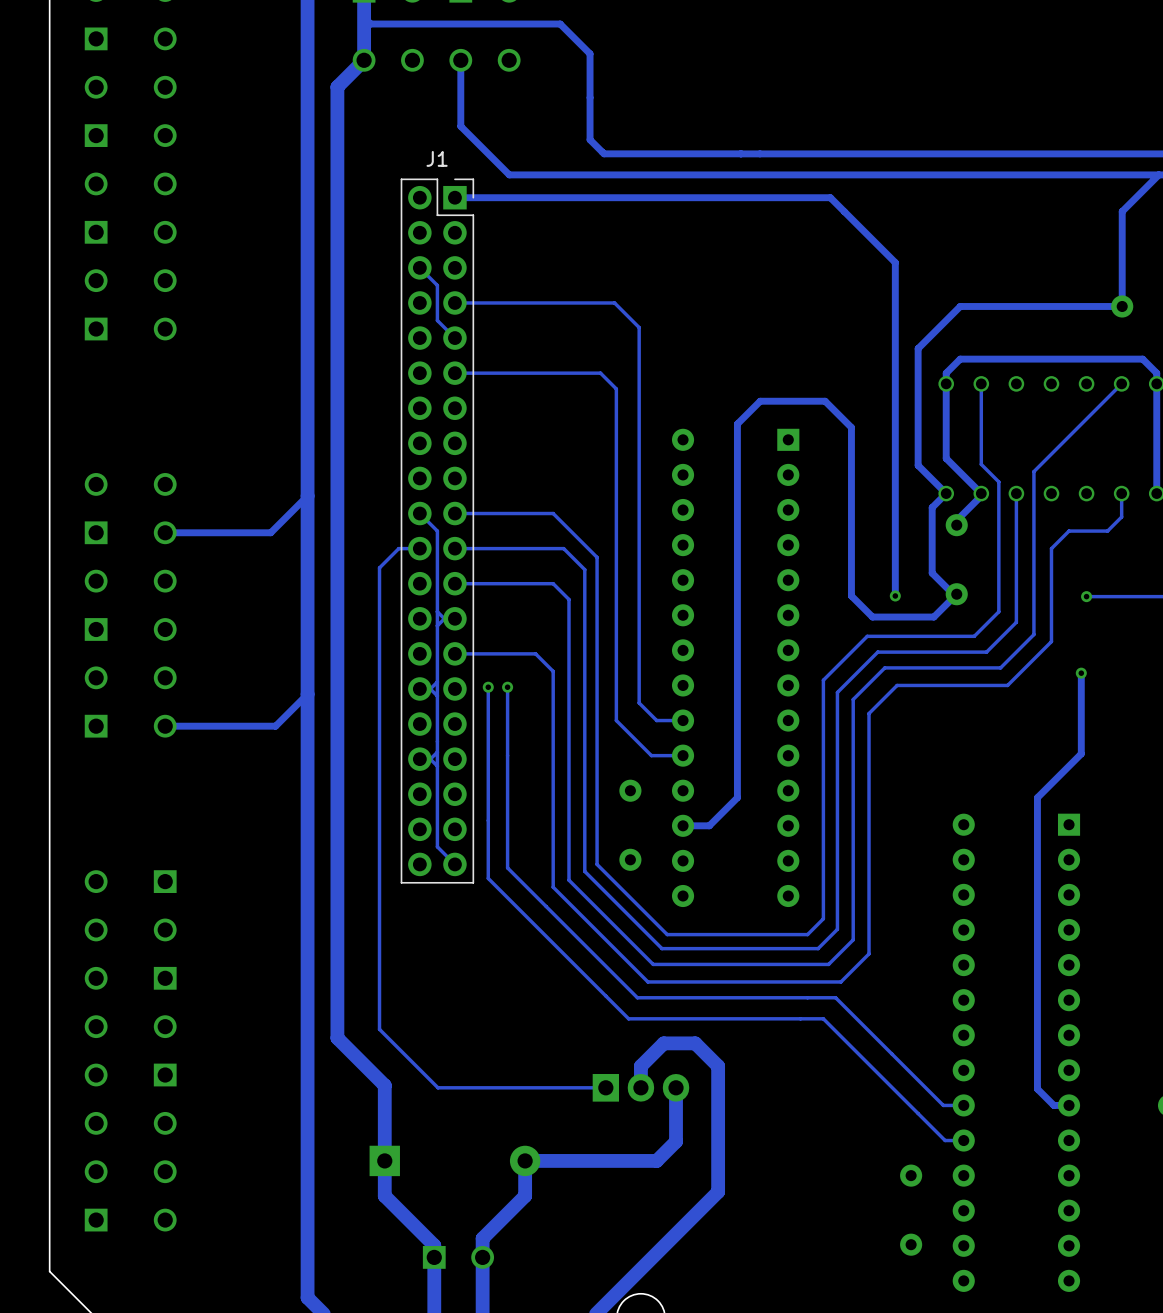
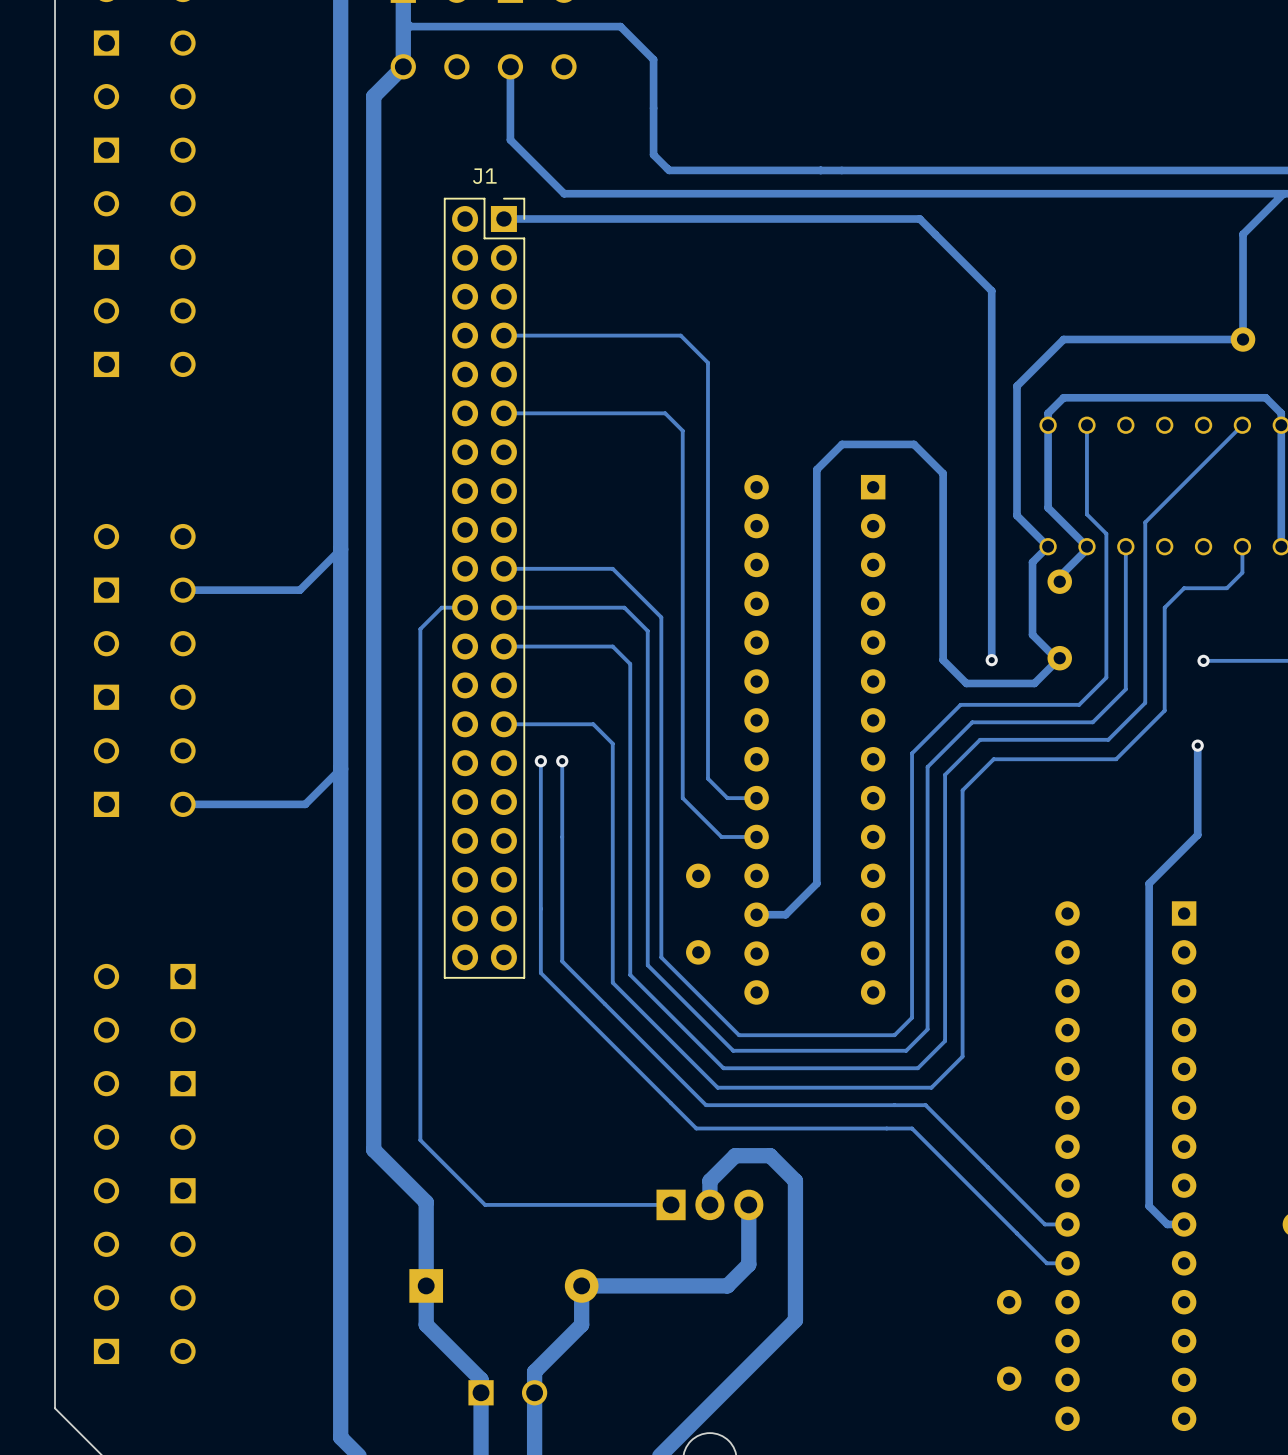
track: (419, 267) (437, 285) (437, 320) (454, 338) -> none
track: (419, 513) (437, 531) (437, 846) (454, 864) -> none
track: (437, 611) (444, 618) -> none
track: (444, 618) (437, 625) -> none
track: (437, 681) (430, 688) -> none
track: (430, 688) (437, 695) -> none
track: (437, 752) (430, 759) -> none
track: (430, 759) (437, 766) -> none

